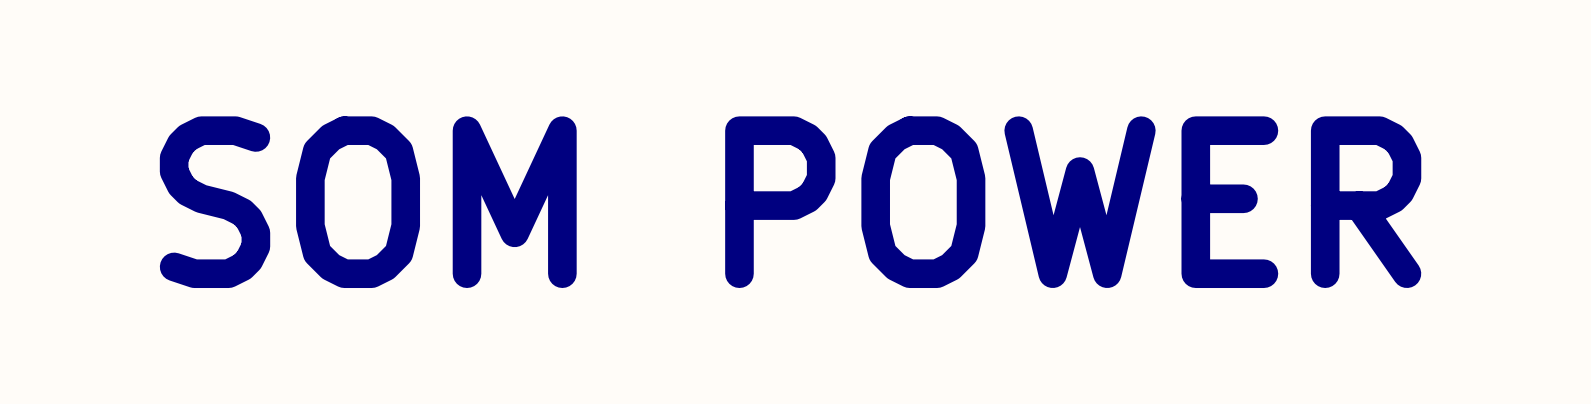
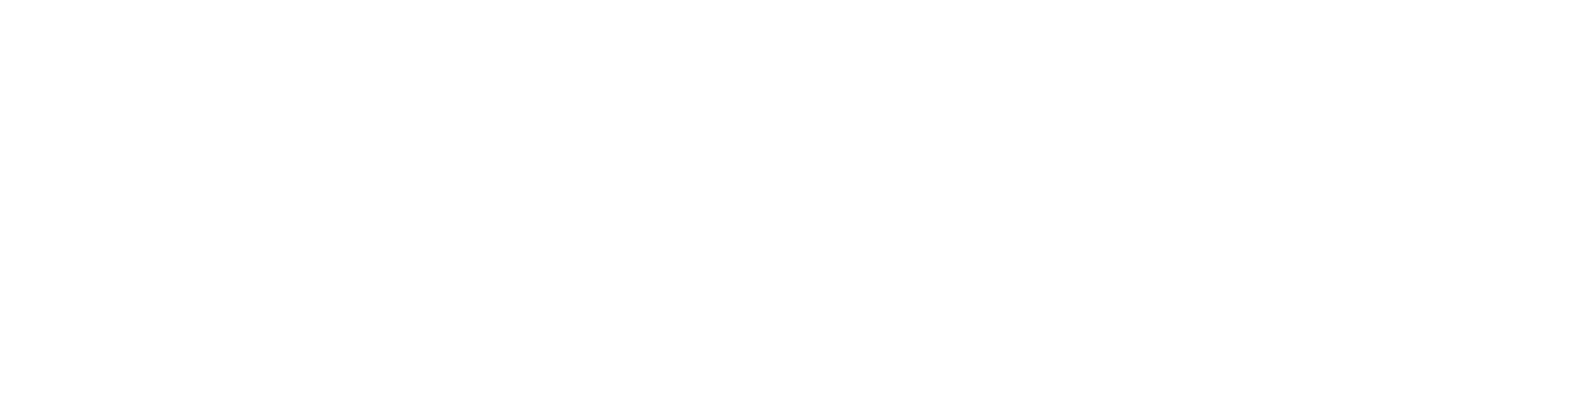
text: SOM POWER (790, 202) -> none

